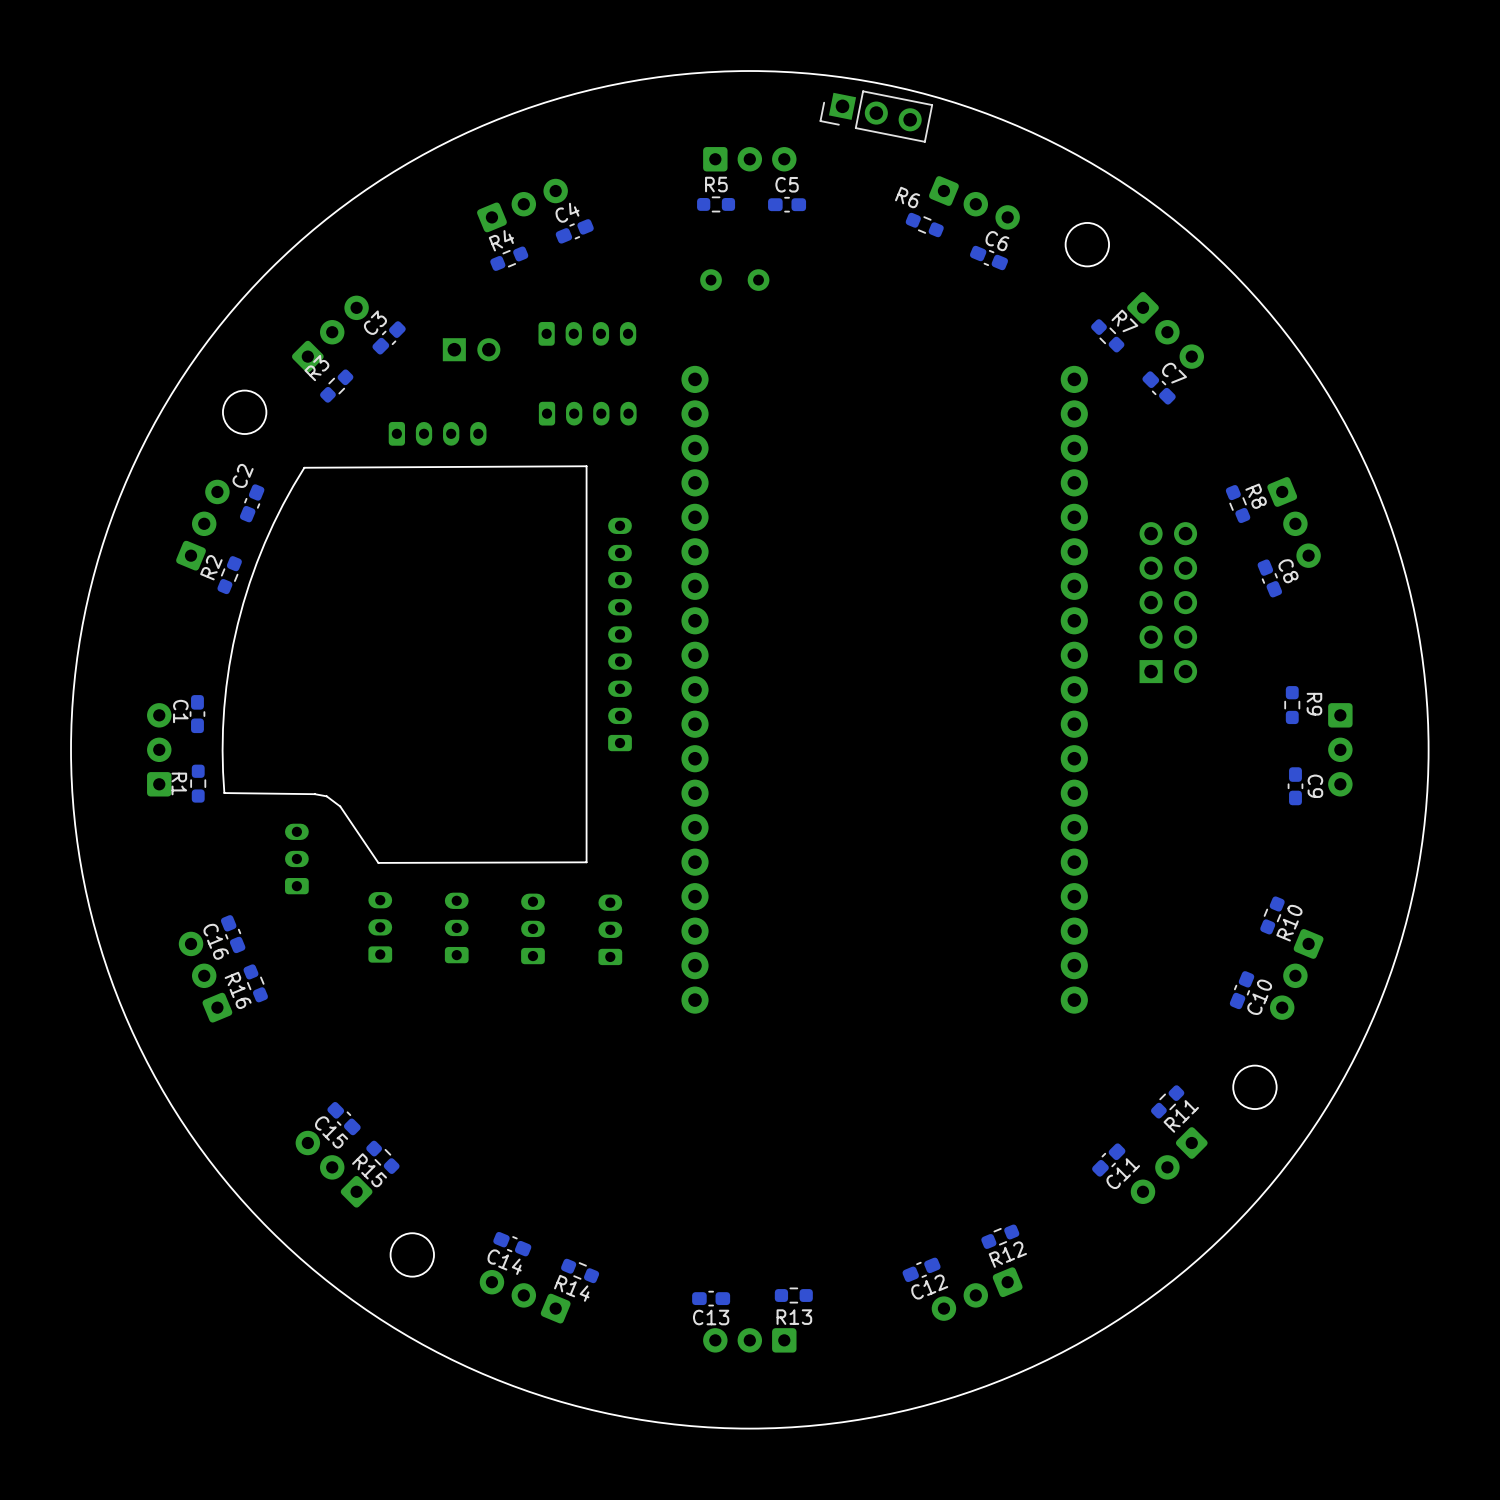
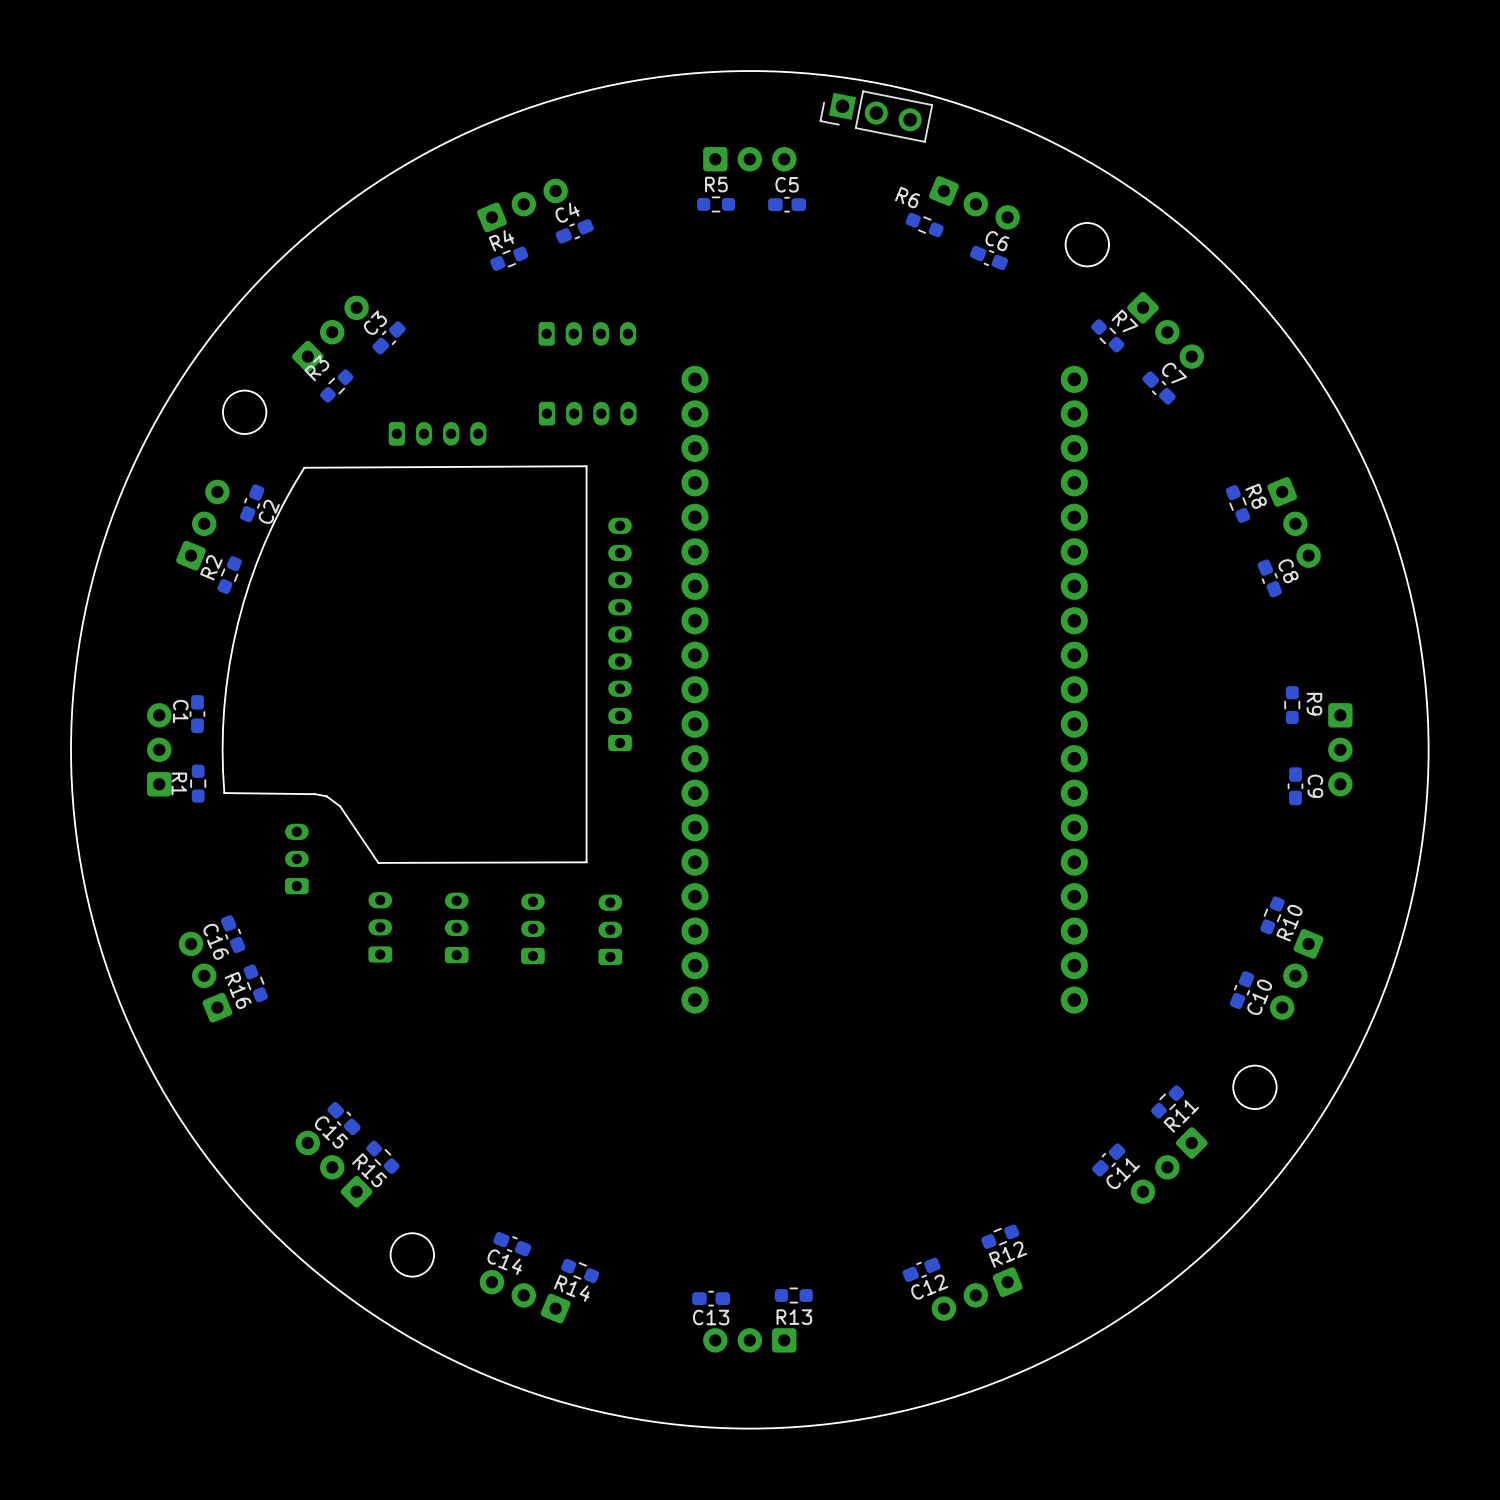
part: (734, 280) -> none
part: (471, 349) -> none
C2 name position: C2 (243, 475) -> C2 (269, 511)
part: (1168, 602) -> none

